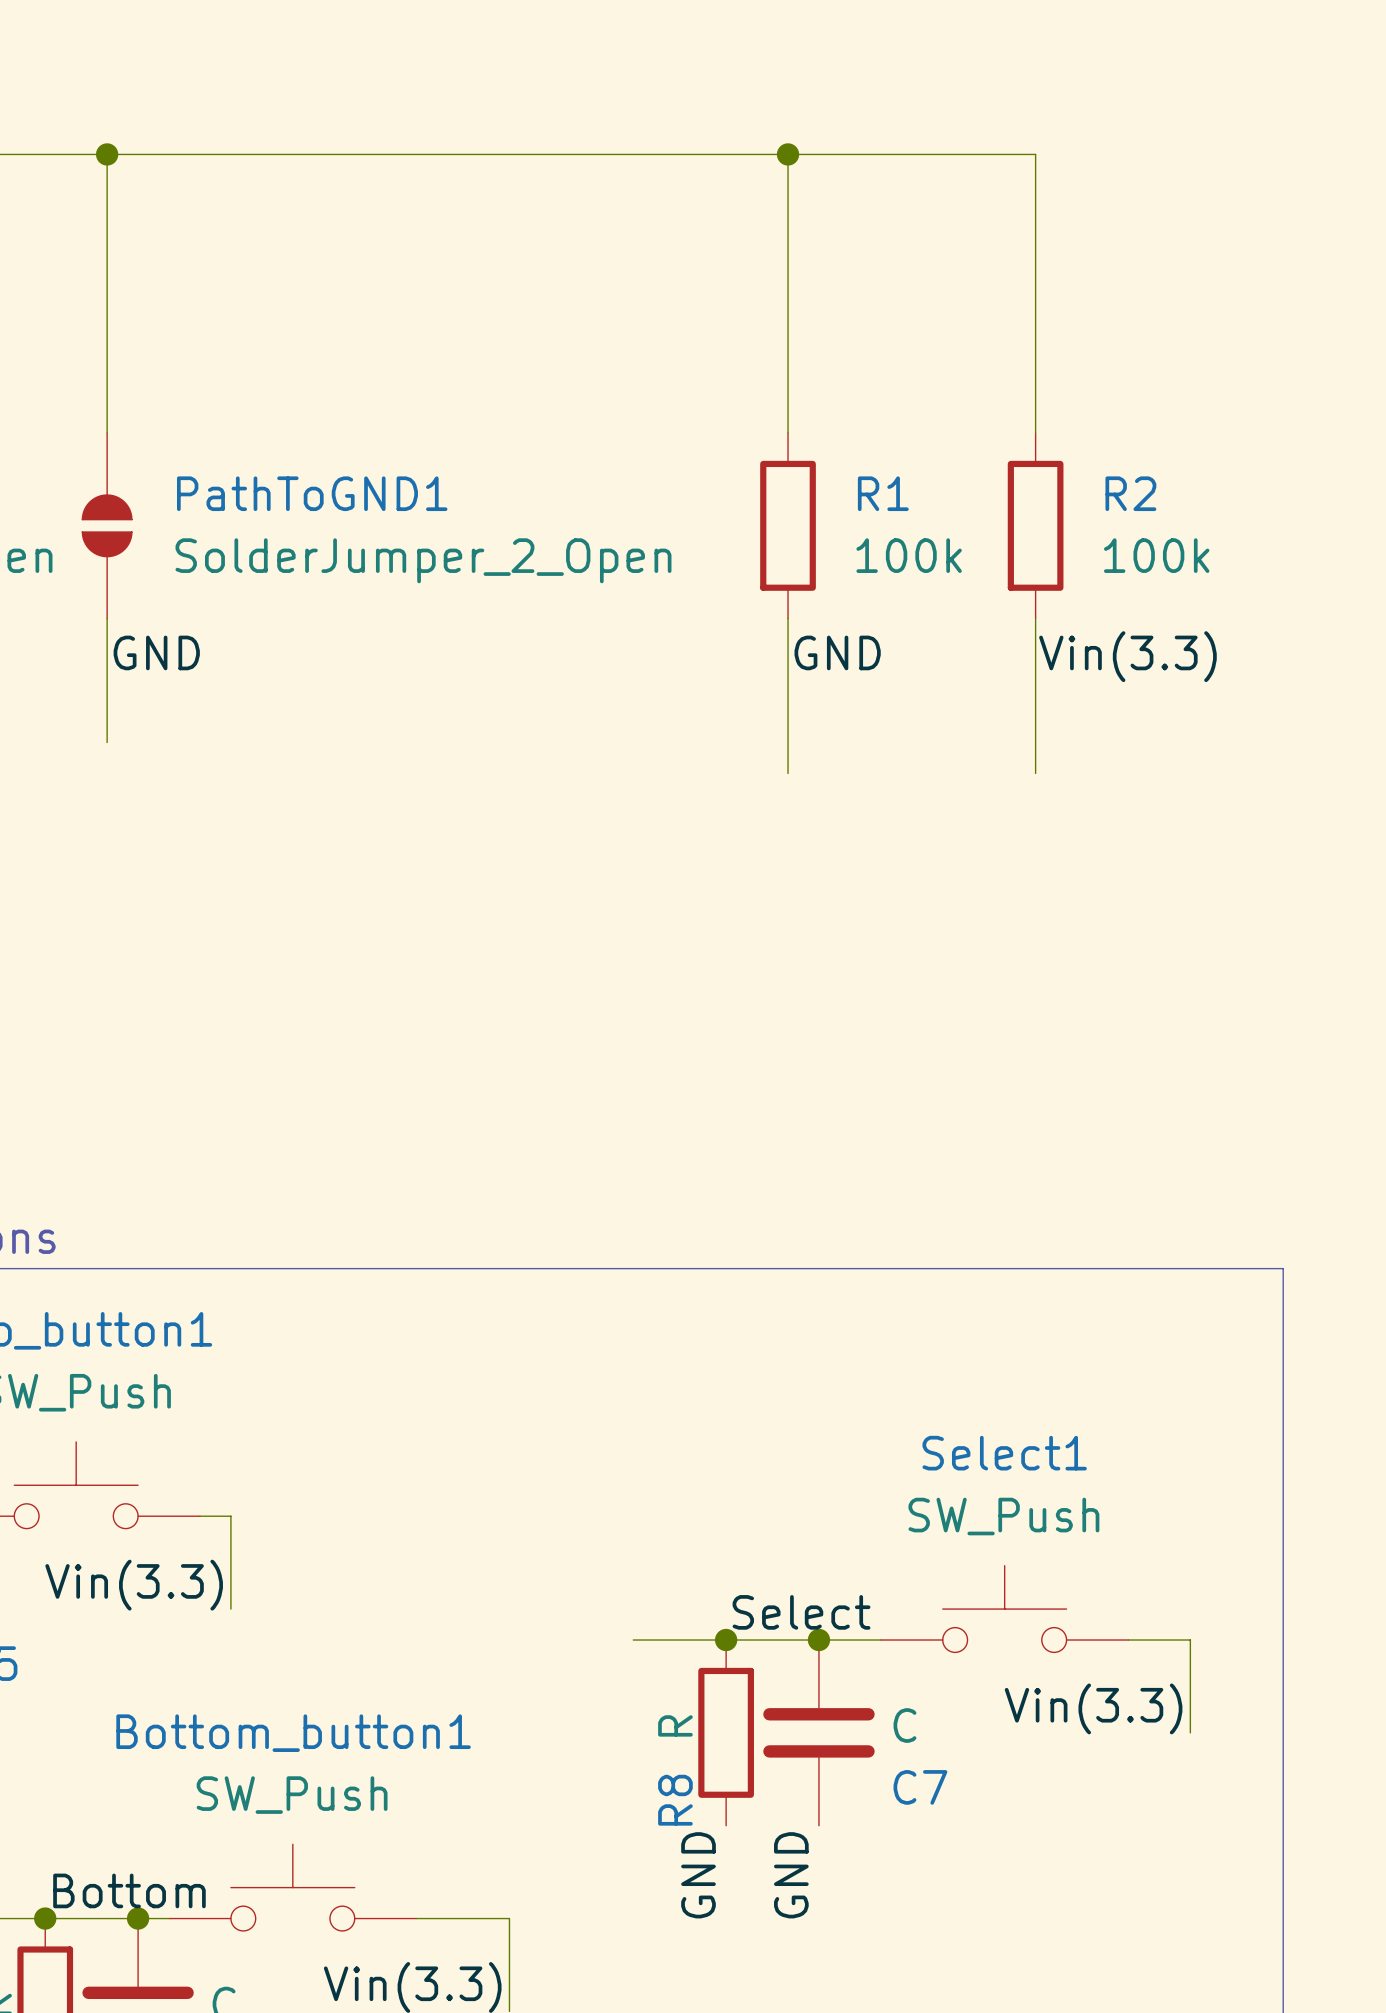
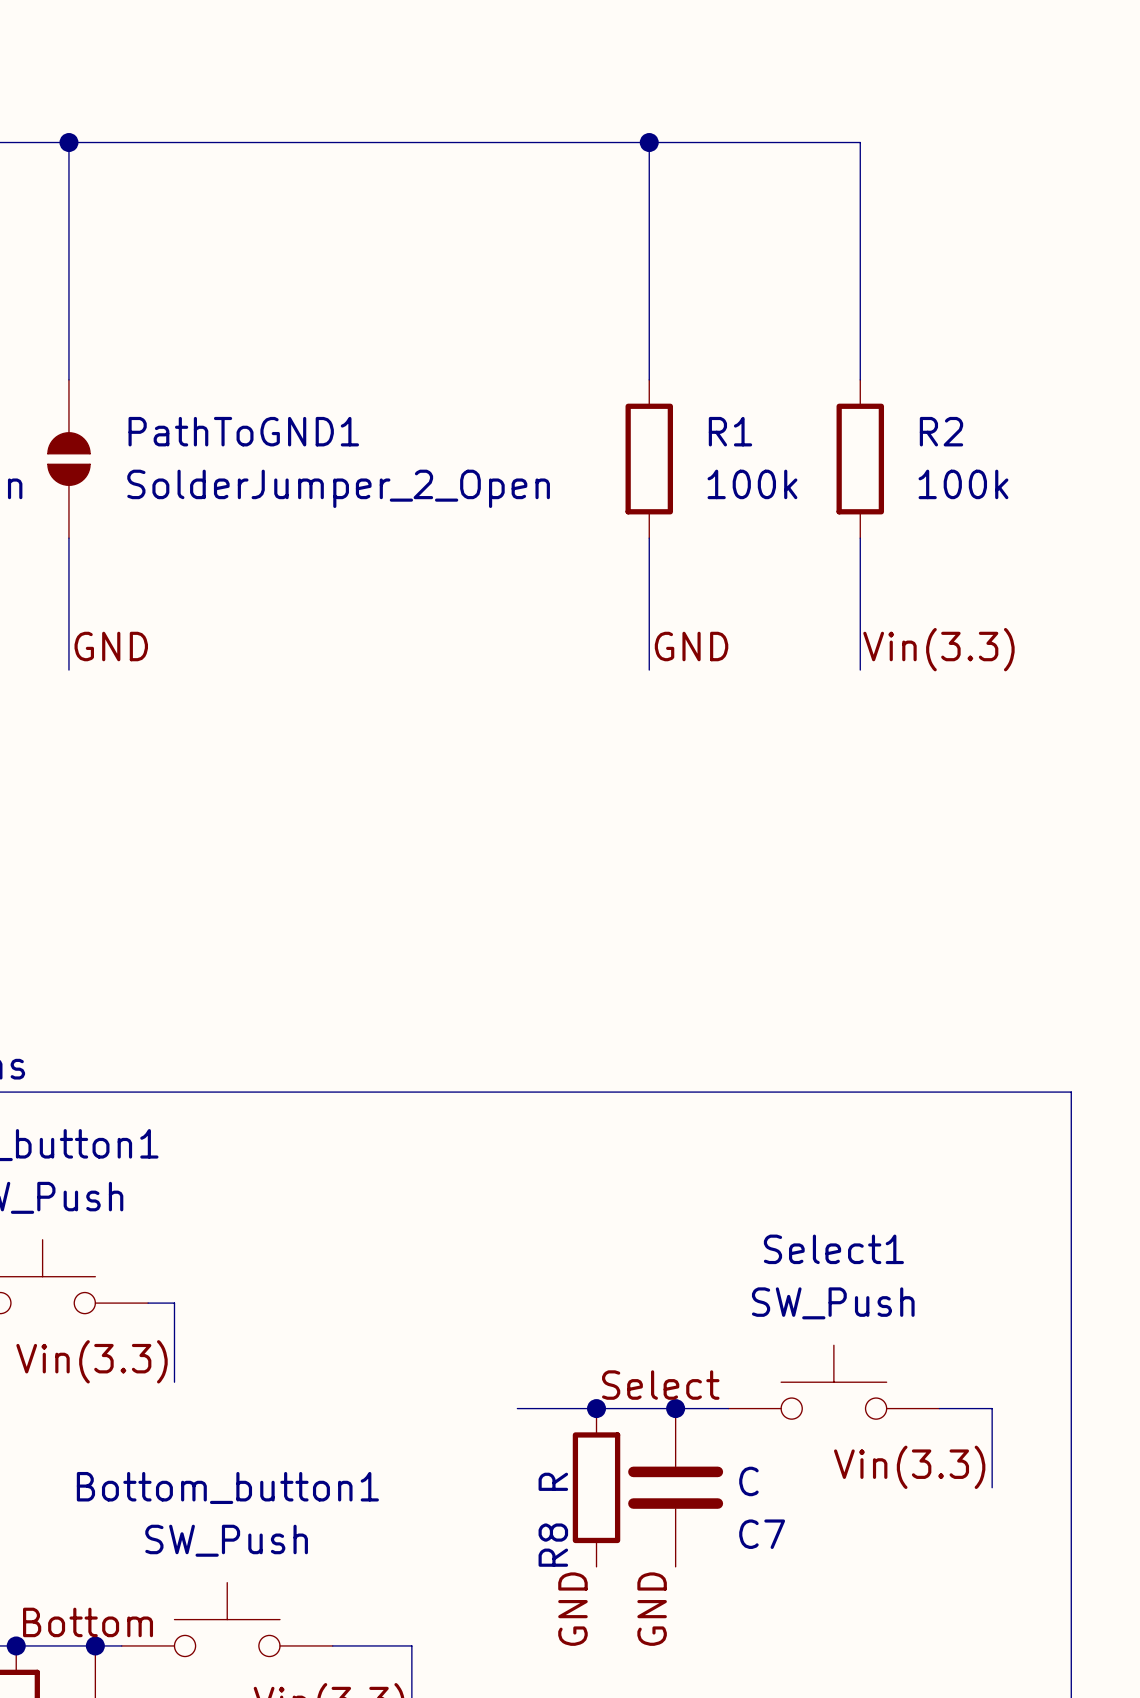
label position: GND (156, 652) -> GND (111, 646)
label position: GND (837, 652) -> GND (691, 646)
label position: Vin(3.3) (1127, 656) -> Vin(3.3) (938, 649)
wire: none -> (68, 643) (68, 670)

